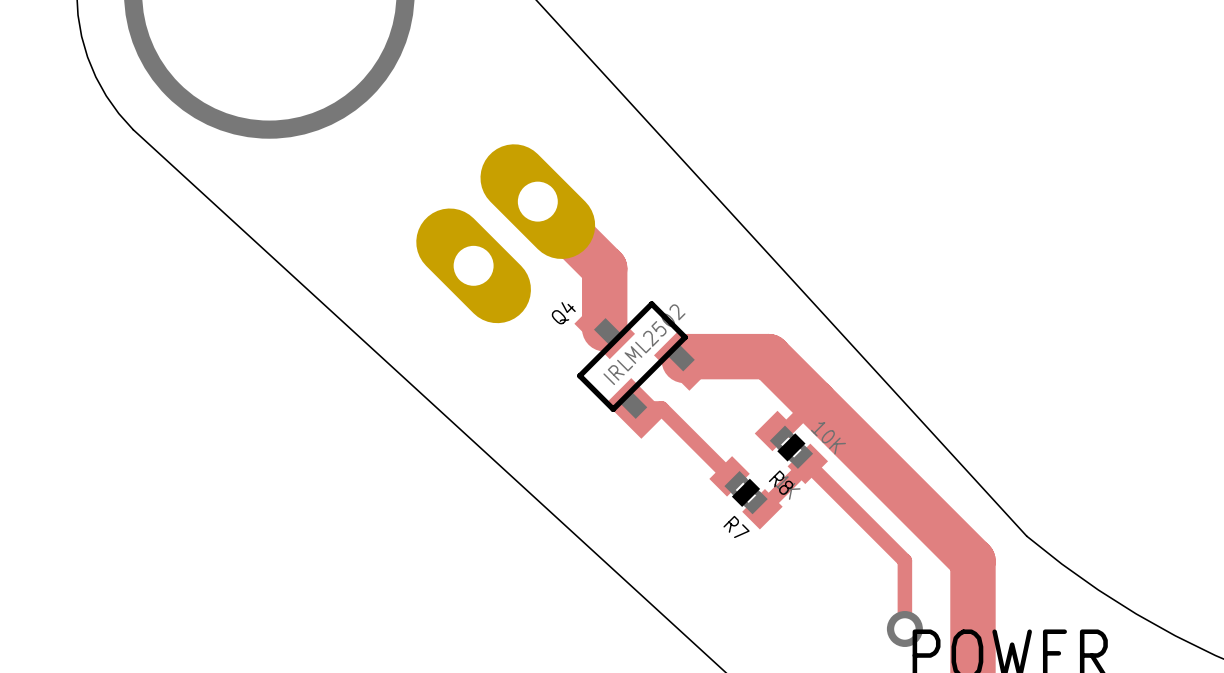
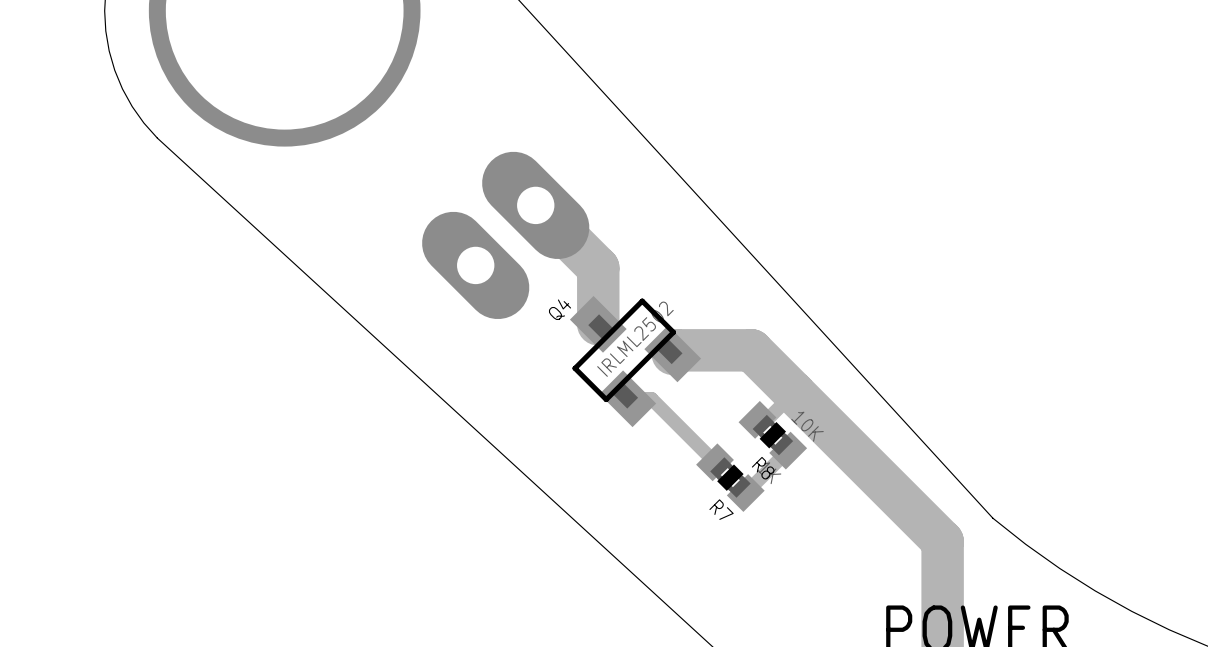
track: (807, 463) (904, 560) (904, 629) -> none
via: (904, 629) -> none

